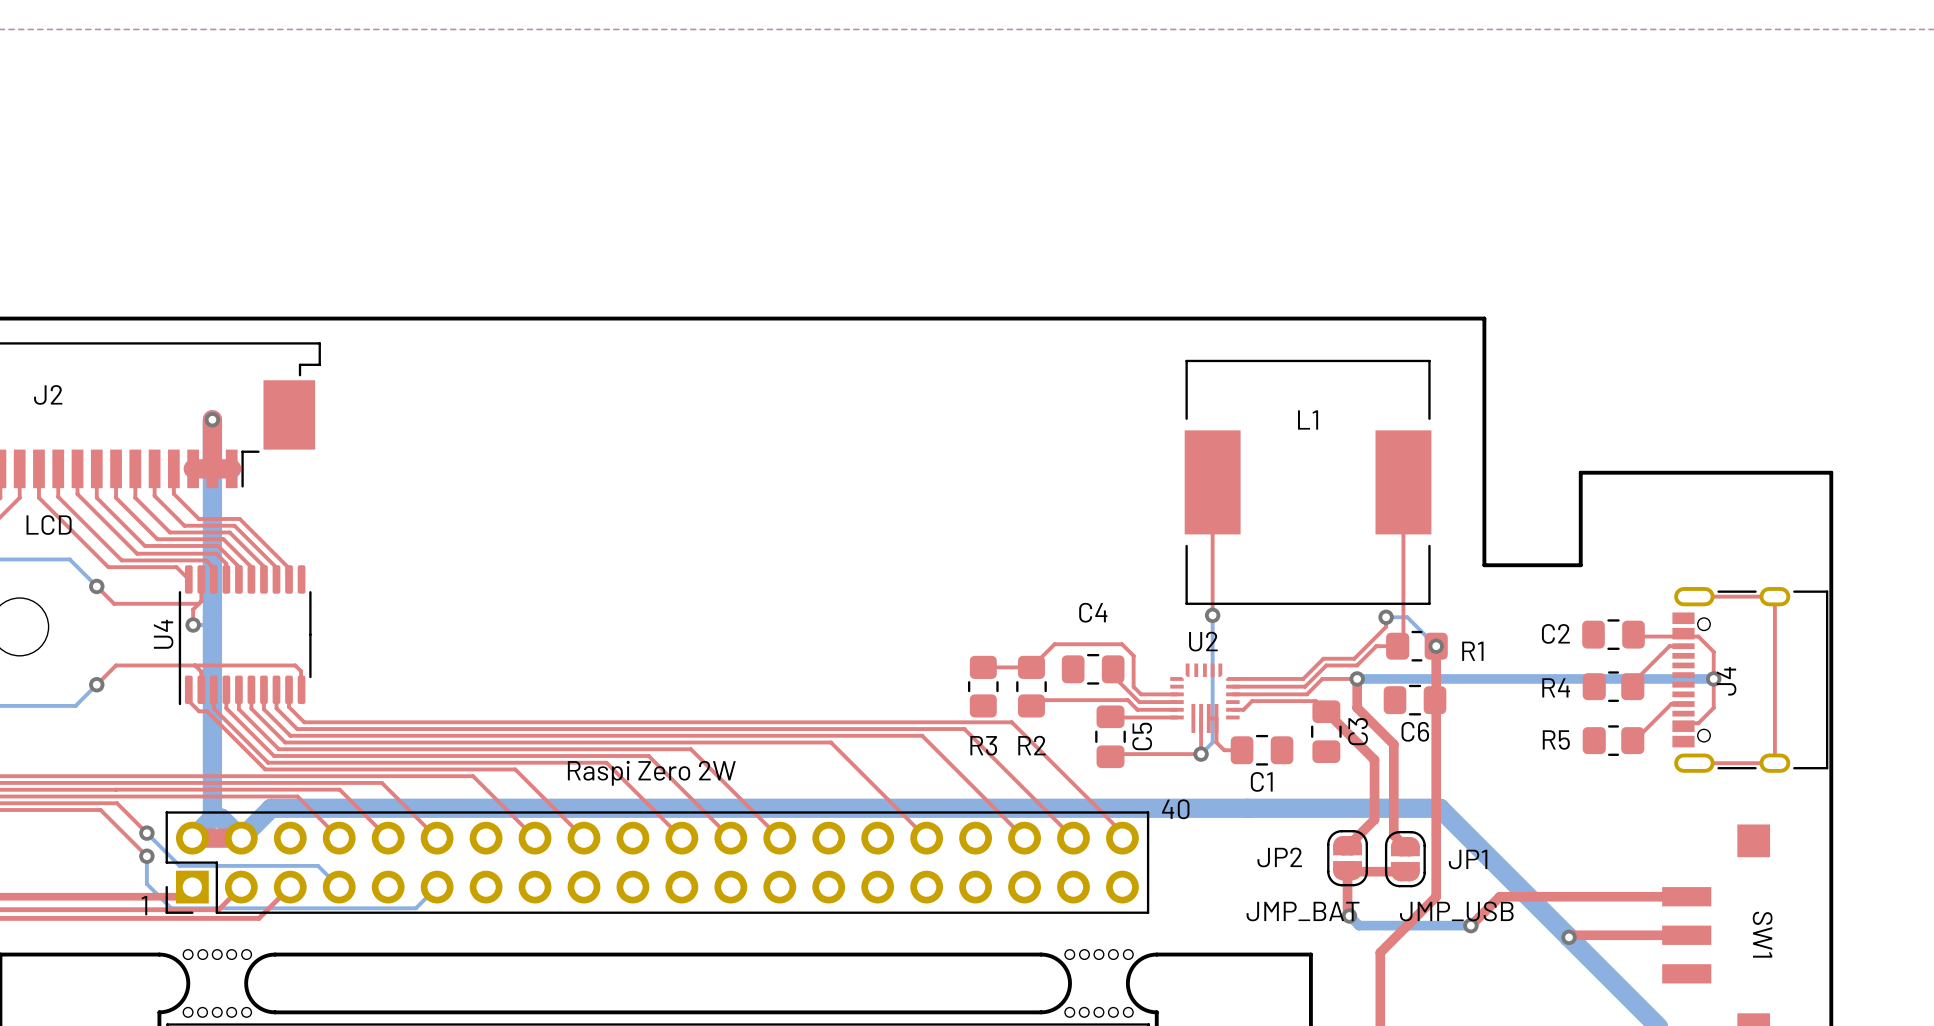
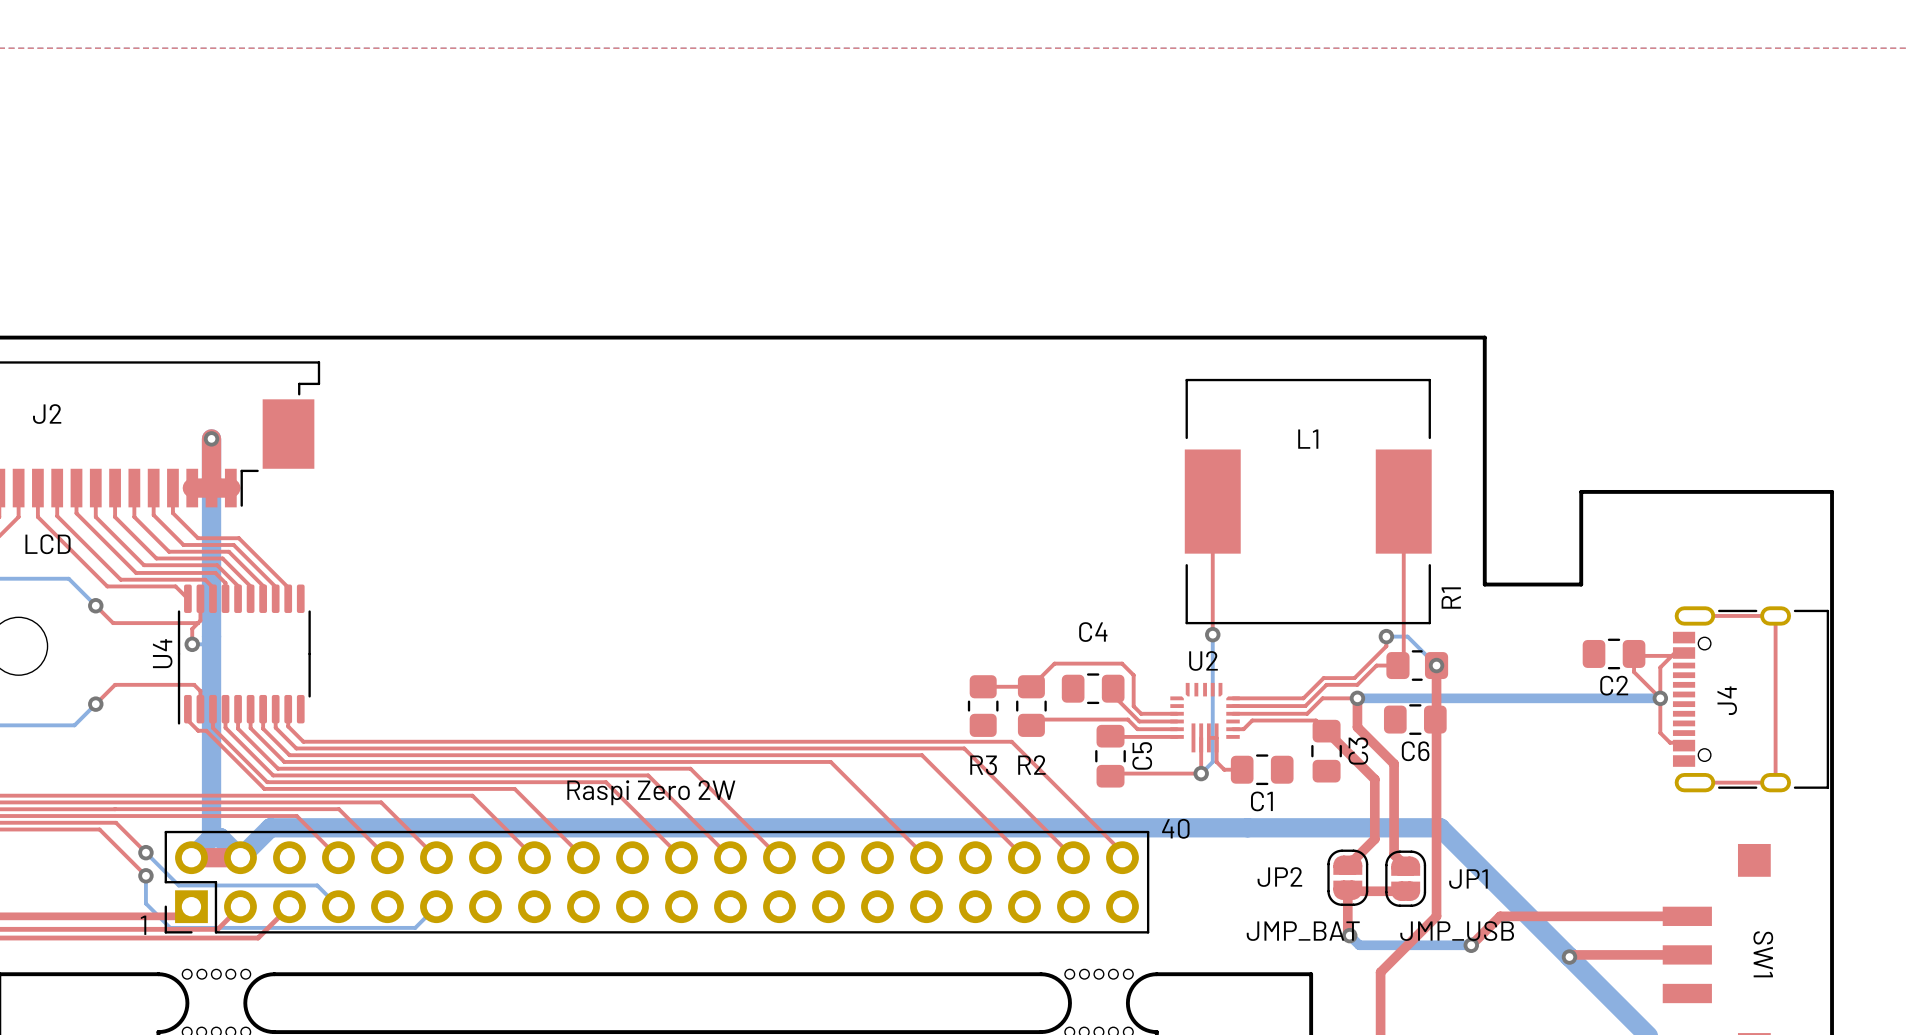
C2 name position: C2 (1555, 633) -> C2 (1614, 685)
top track: none -> (1634, 653) (1634, 672) (1660, 698)
top track: (1683, 636) (1698, 636) (1713, 651) (1713, 707) (1698, 723) (1683, 723) -> (1684, 650) (1677, 650) (1660, 667) (1660, 732) (1670, 742) (1684, 742)
top track: (1683, 646) (1669, 646) (1632, 682) (1632, 686) -> none
R1 name rotation: 0° (1472, 651) -> 90° counterclockwise (1451, 598)
R1 name position: R1 (1472, 651) -> R1 (1451, 598)
top track: (195, 665) (295, 665) (301, 671) (301, 689) -> none
bottom track: (1659, 678) (1713, 678) -> none
via position: (1713, 678) -> (1660, 698)
R4: (1613, 686) -> none
top track: (1683, 704) (1671, 704) (1632, 740) -> none
R5: (1613, 740) -> none

